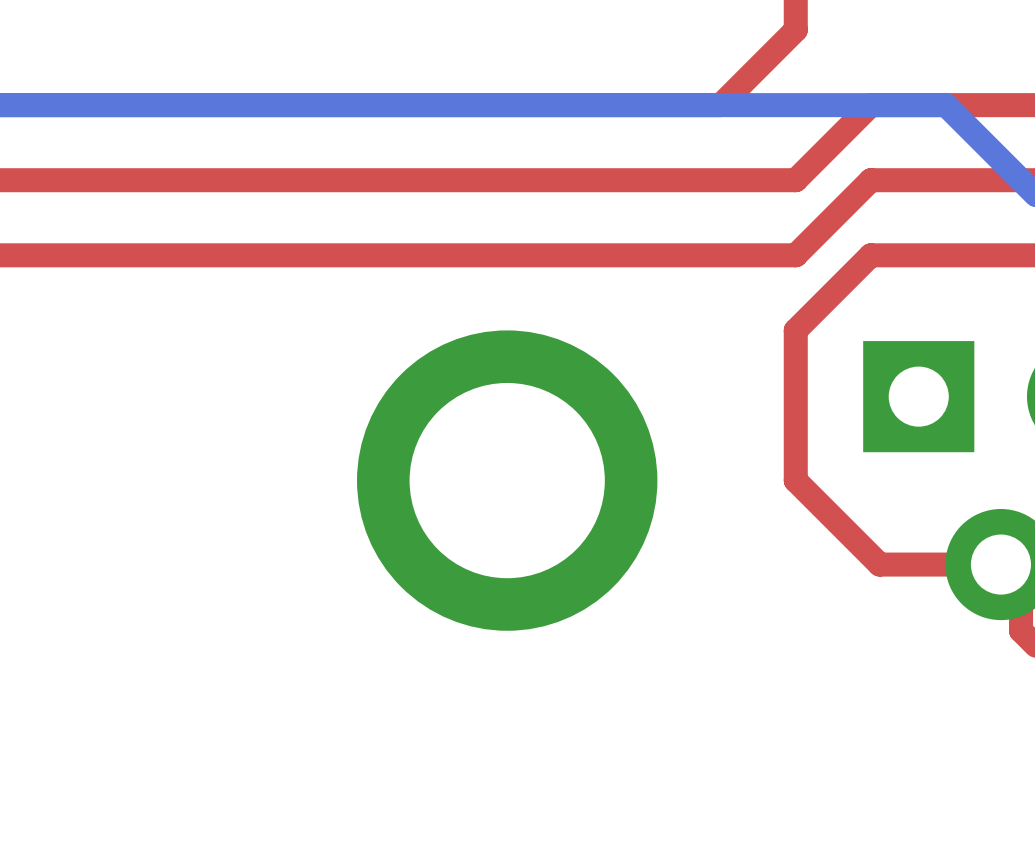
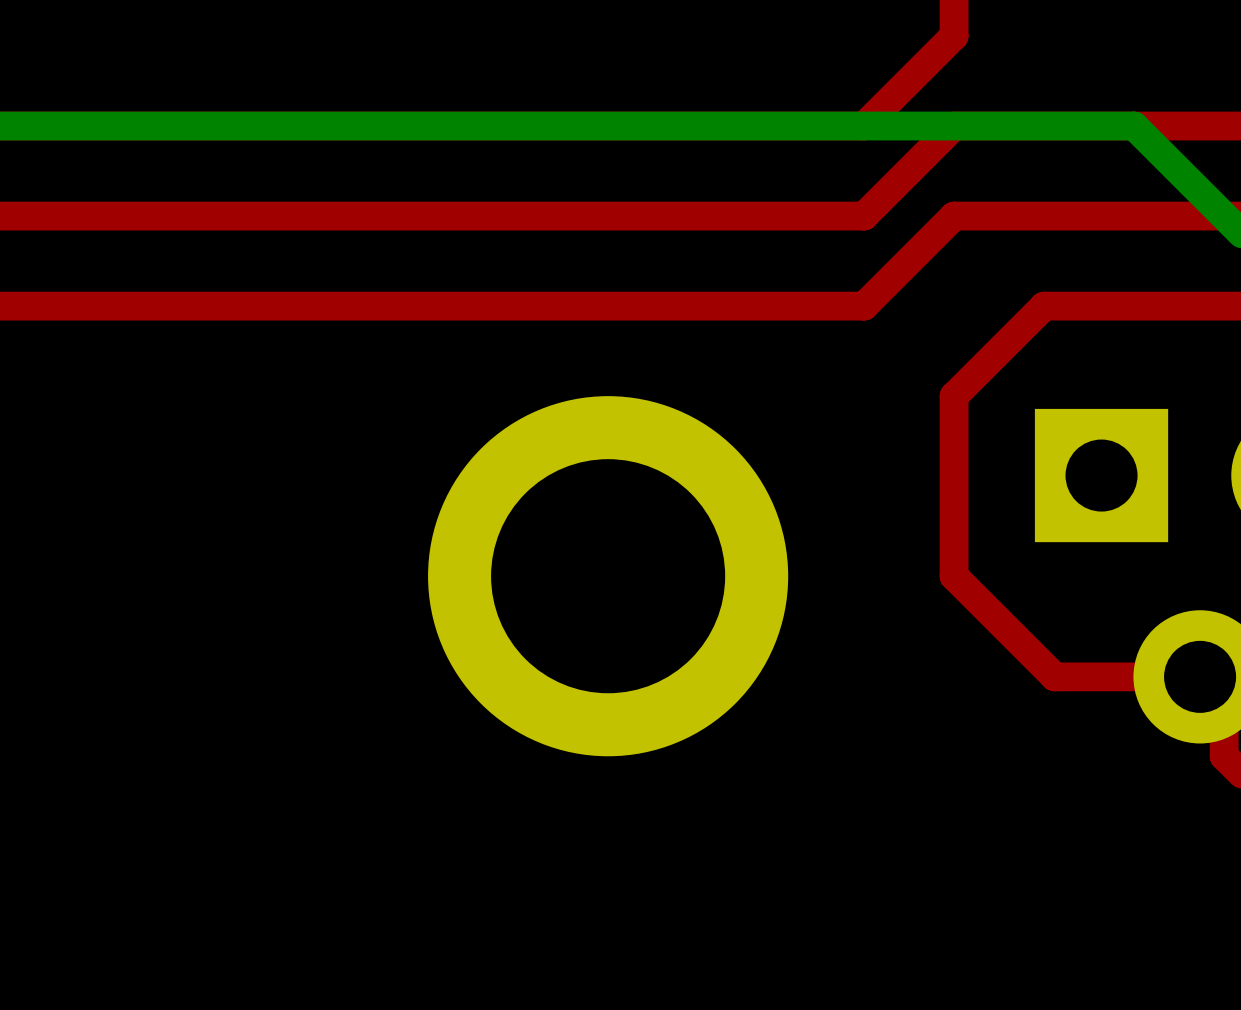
top track: (870, 105) (795, 180) (720, 180) -> (1044, 126) (954, 126) (864, 216)
top track: (870, 180) (795, 255) (720, 255) -> (1044, 216) (954, 216) (864, 306)

